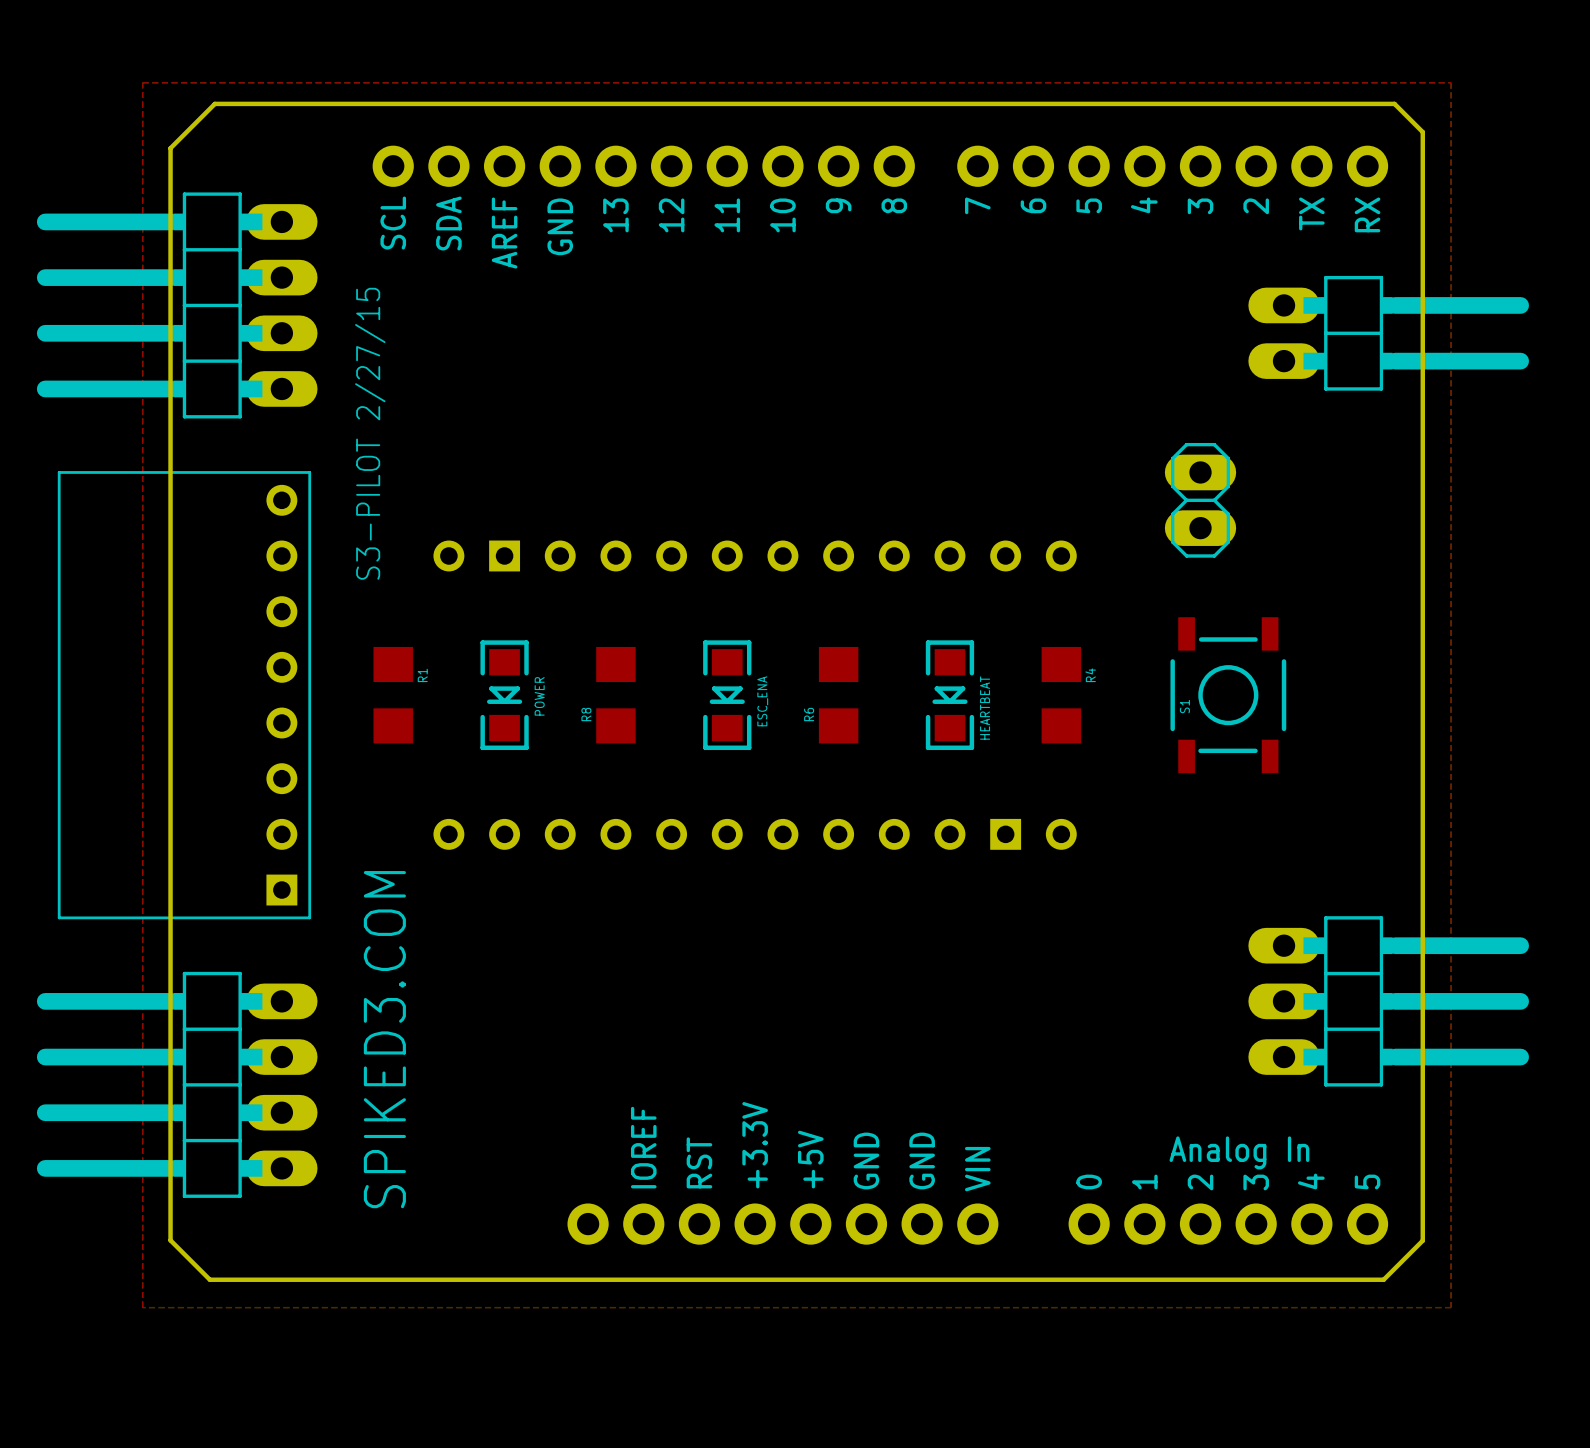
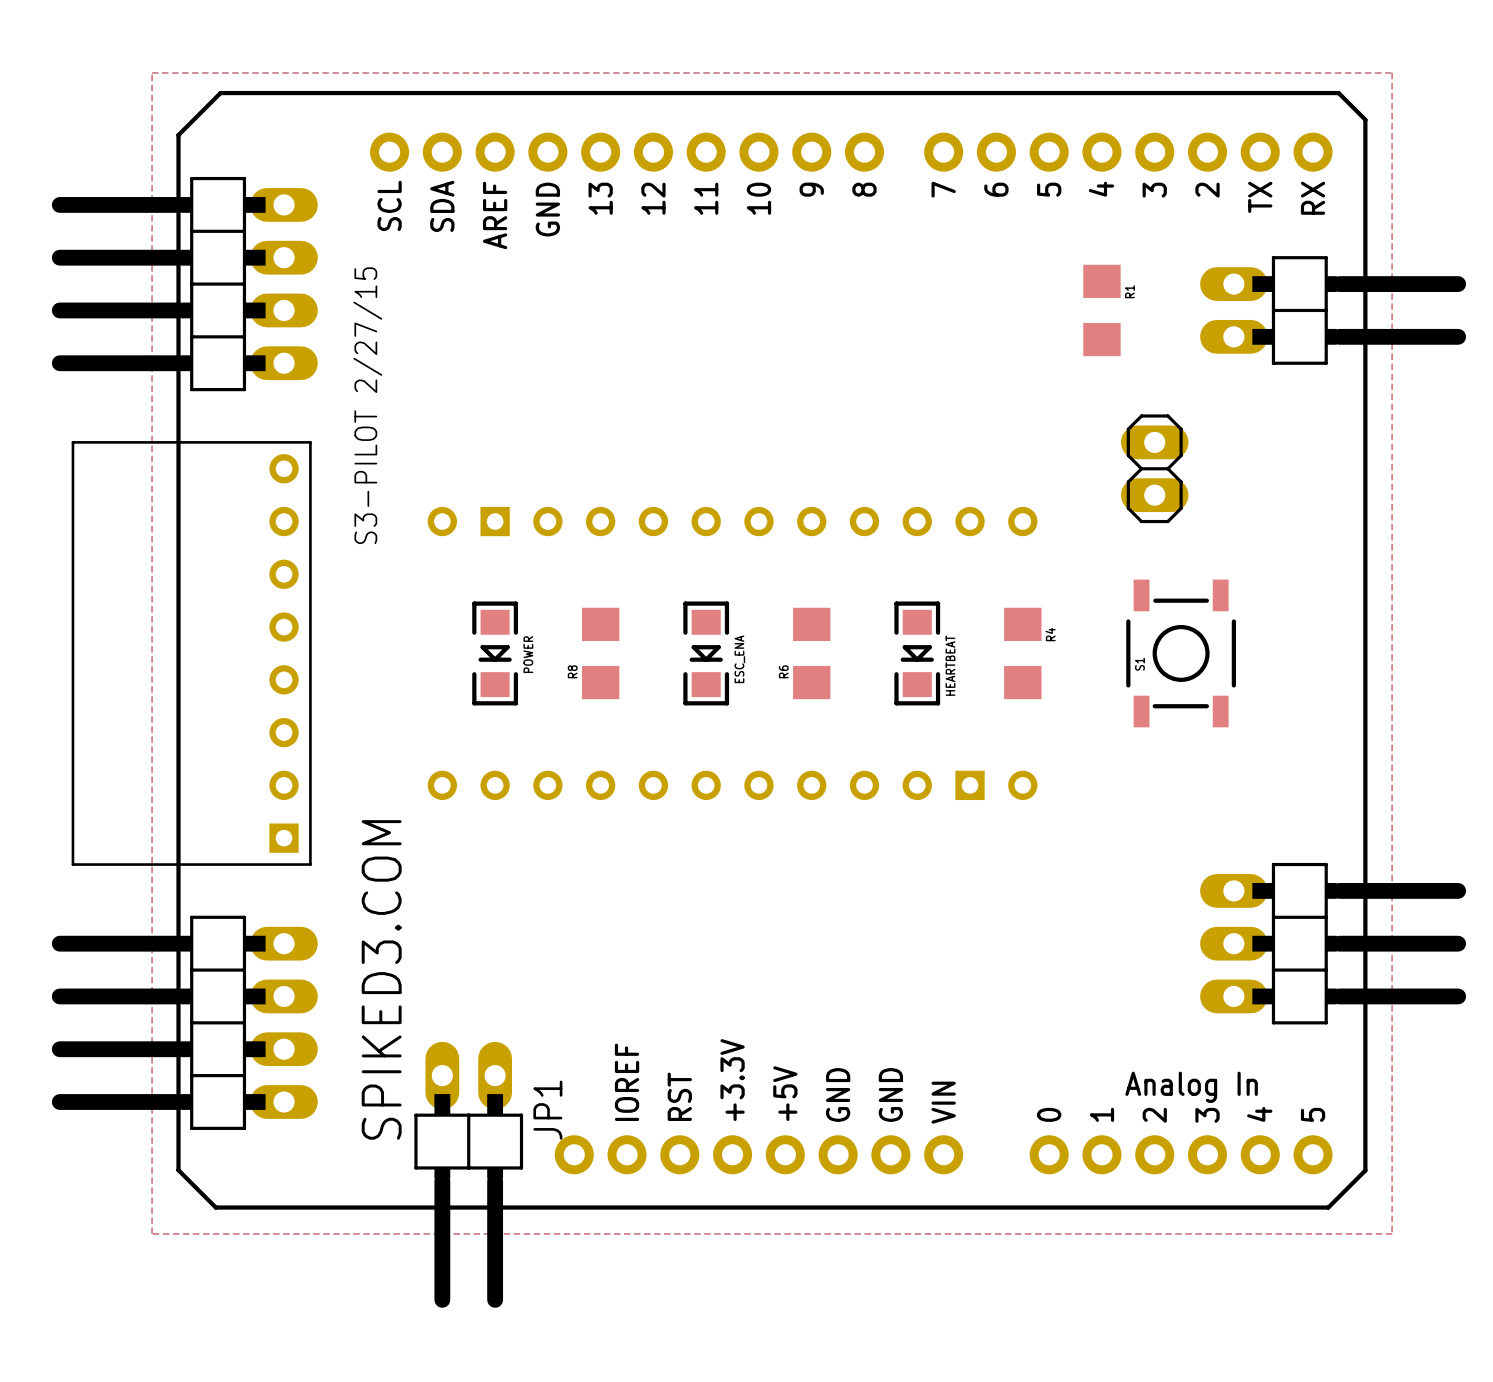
R1 position: (393, 695) -> (1101, 310)
JP1: none -> (468, 1174)

